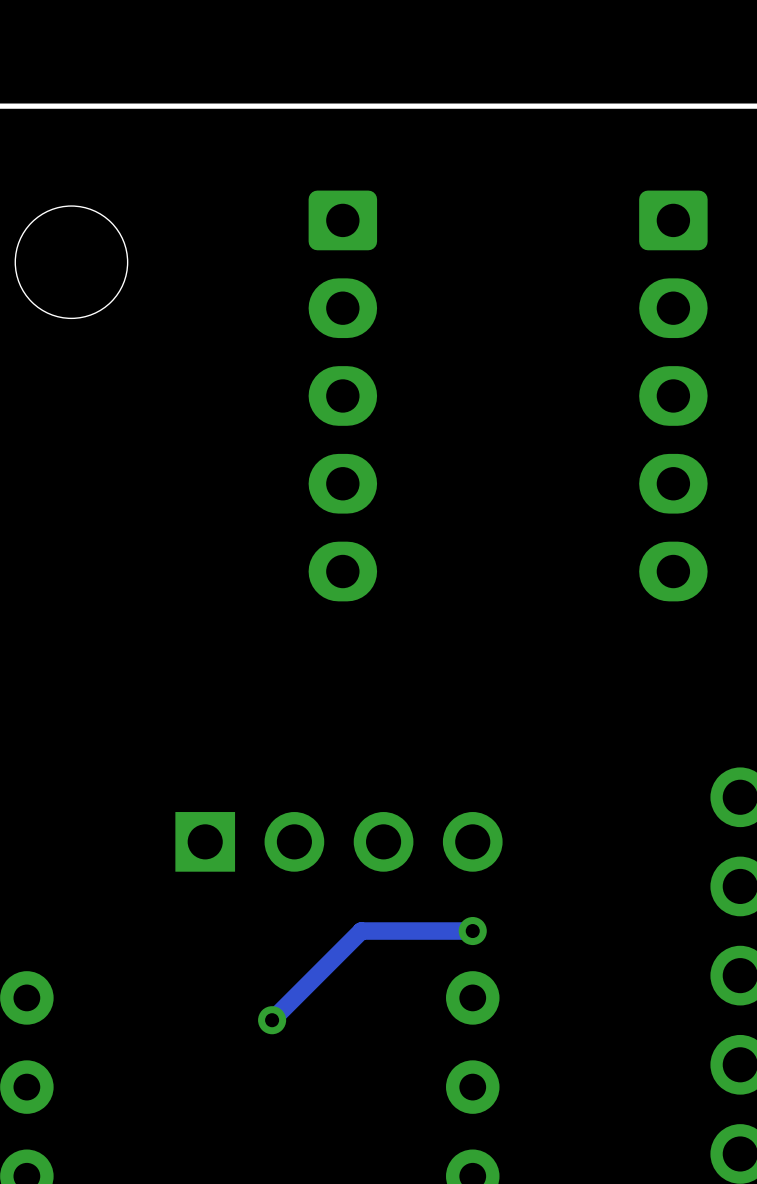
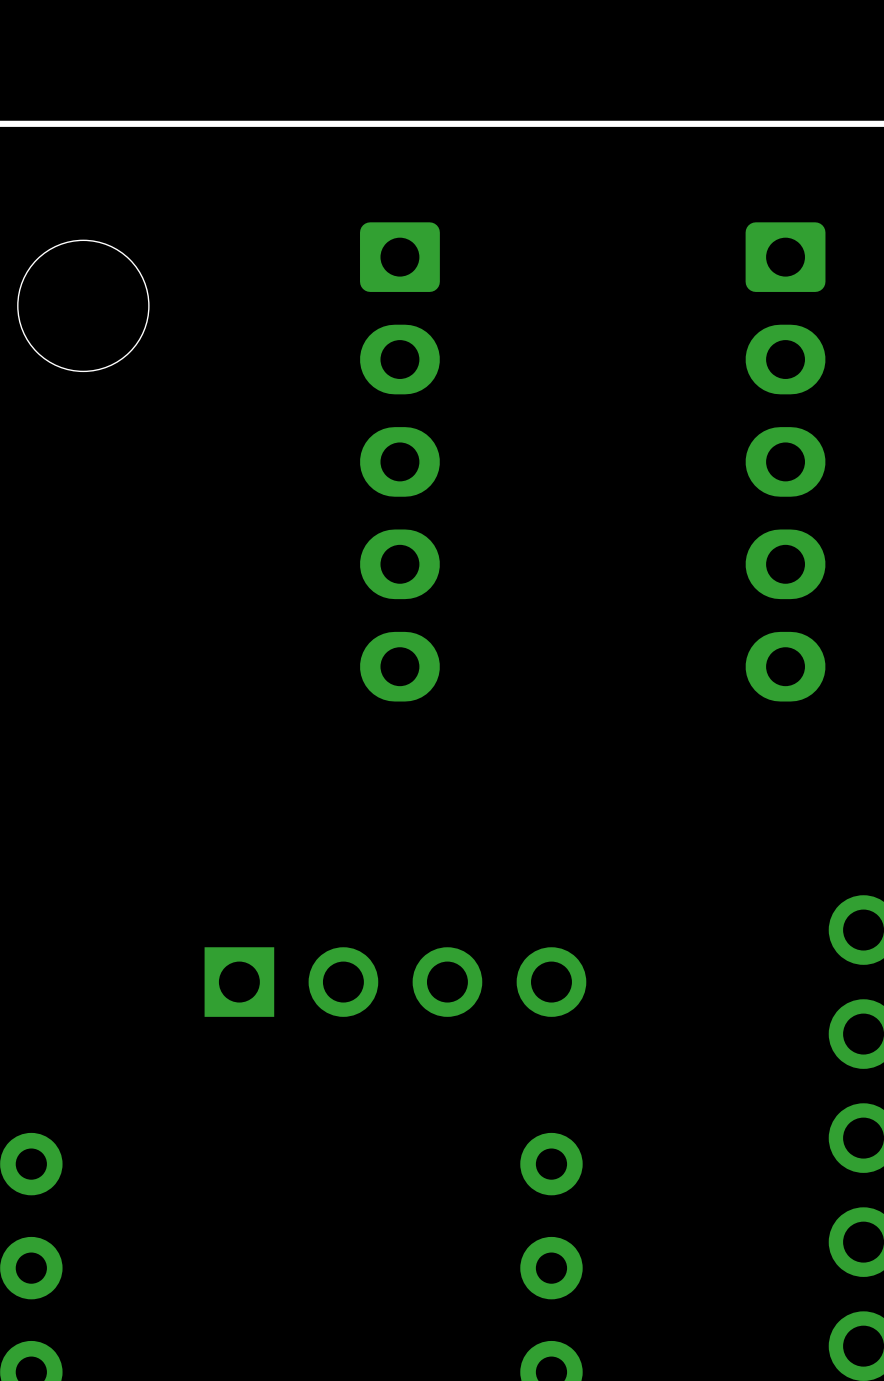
track: (472, 931) (361, 931) (272, 1020) -> none
via: (472, 931) -> none
via: (272, 1020) -> none

